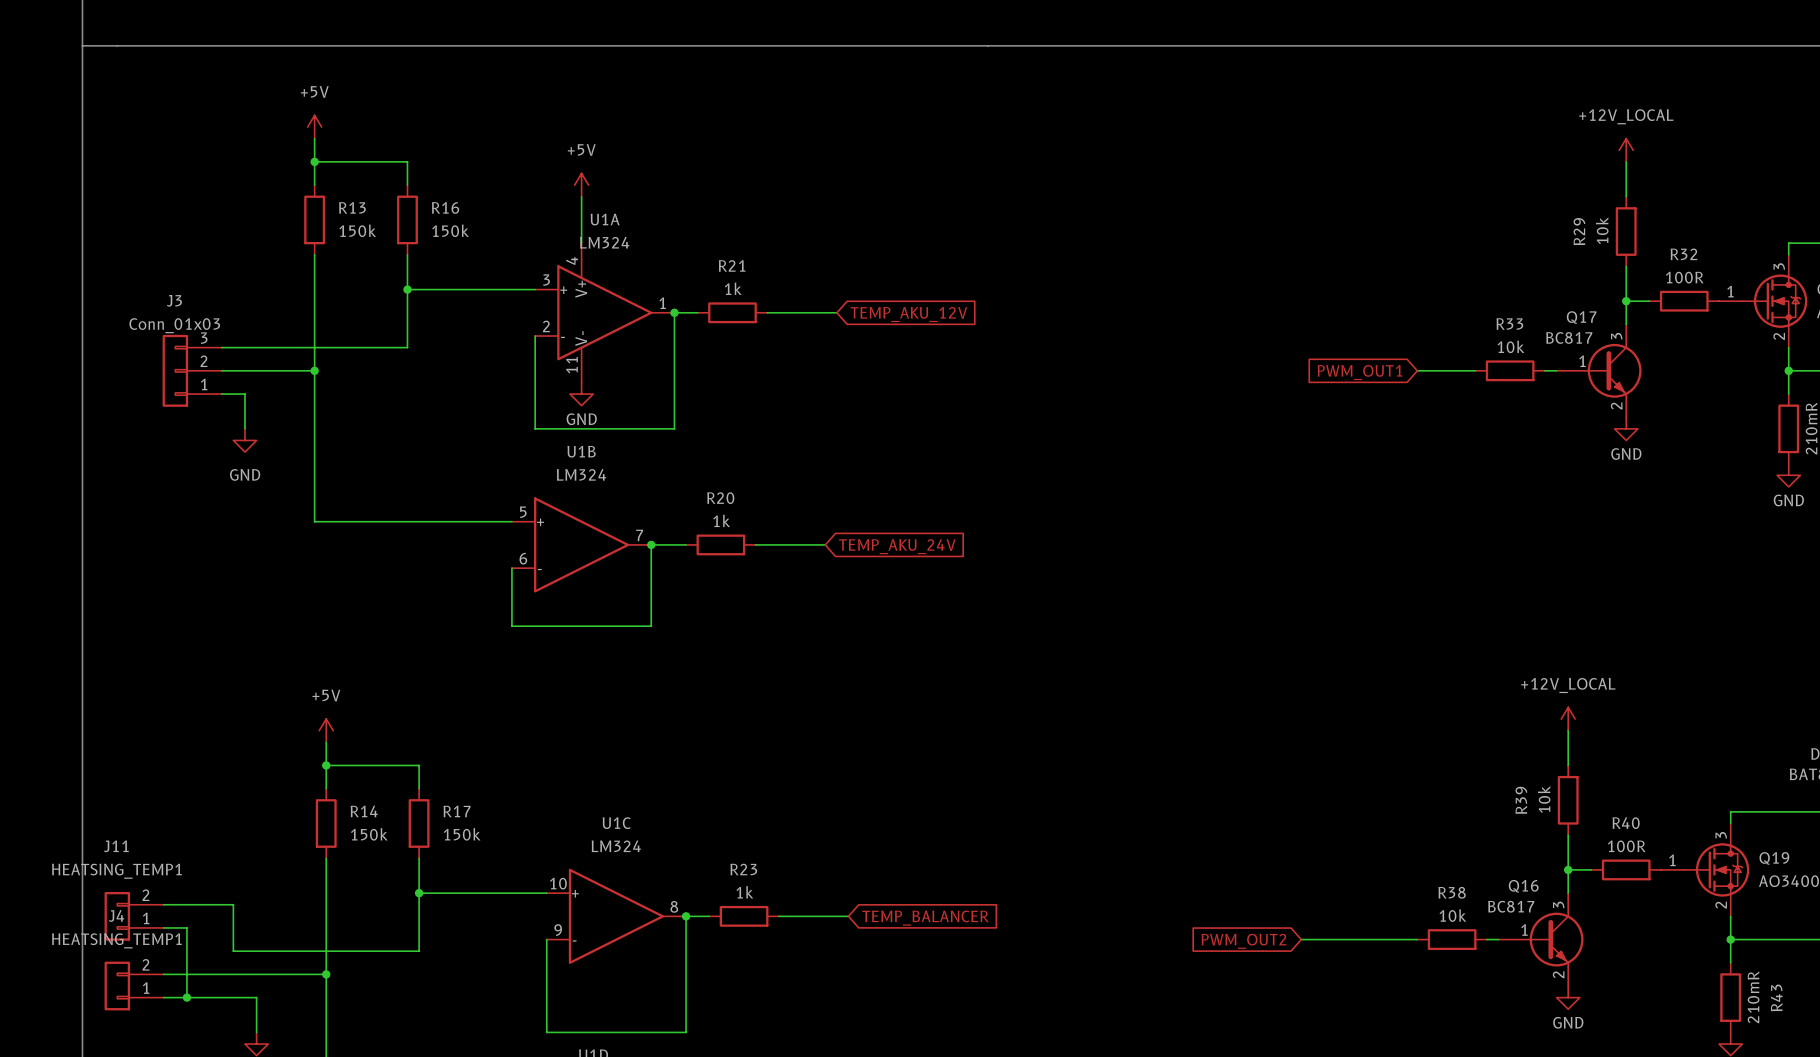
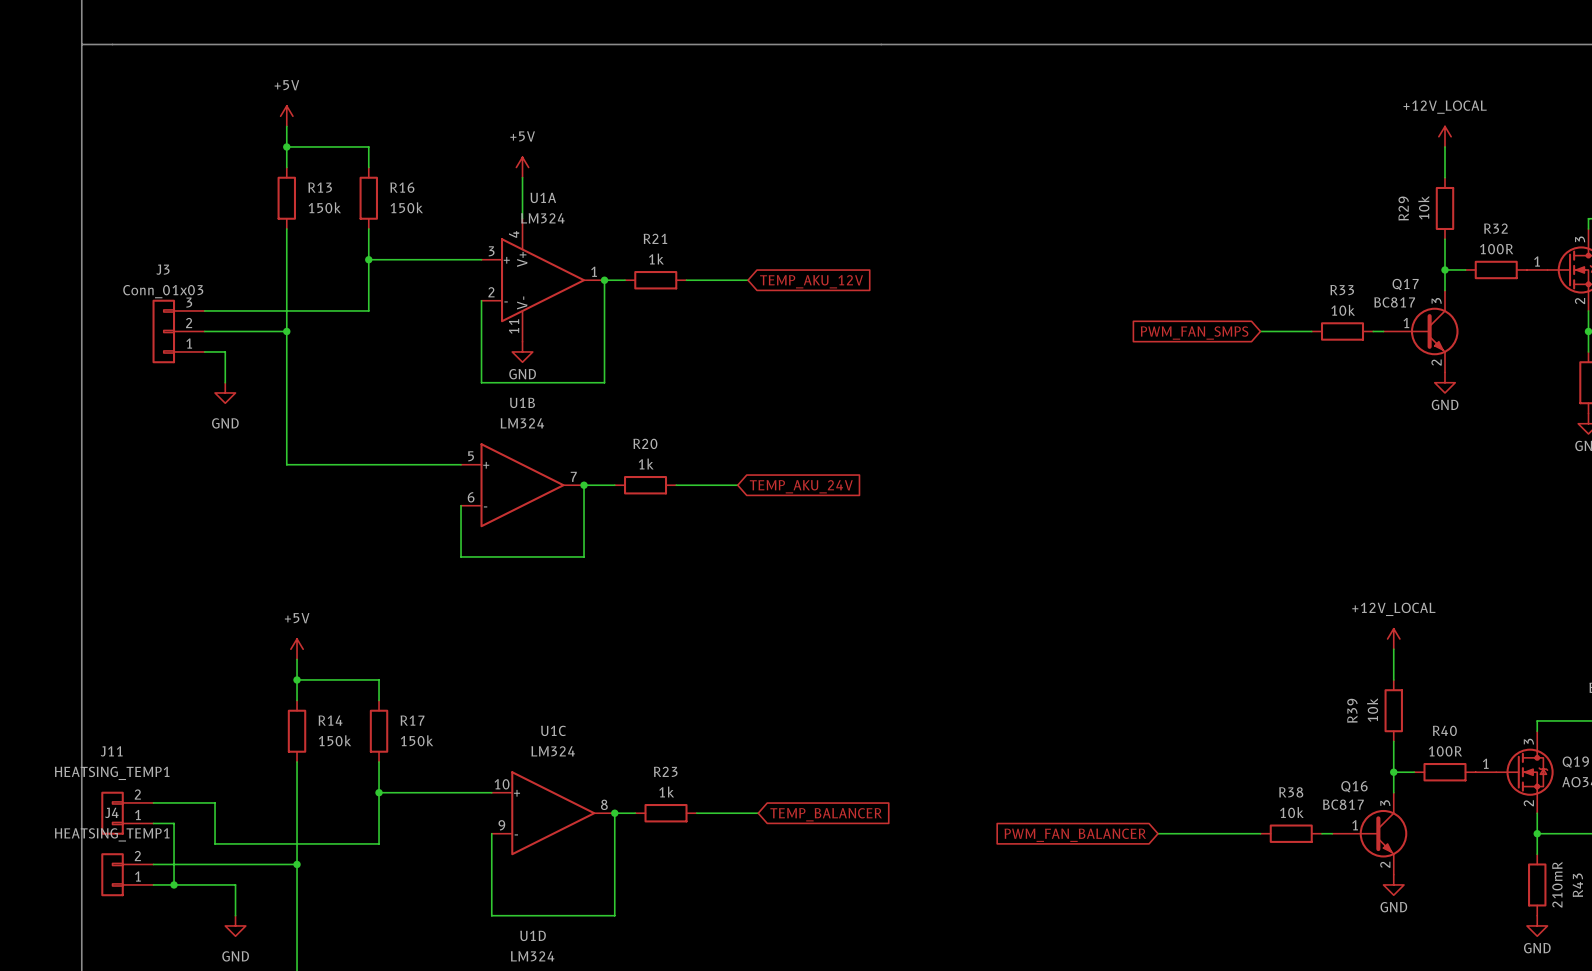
global label: PWM_OUT1 (1359, 372) -> PWM_FAN_SMPS (1194, 333)
global label: PWM_OUT2 (1243, 941) -> PWM_FAN_BALANCER (1075, 835)

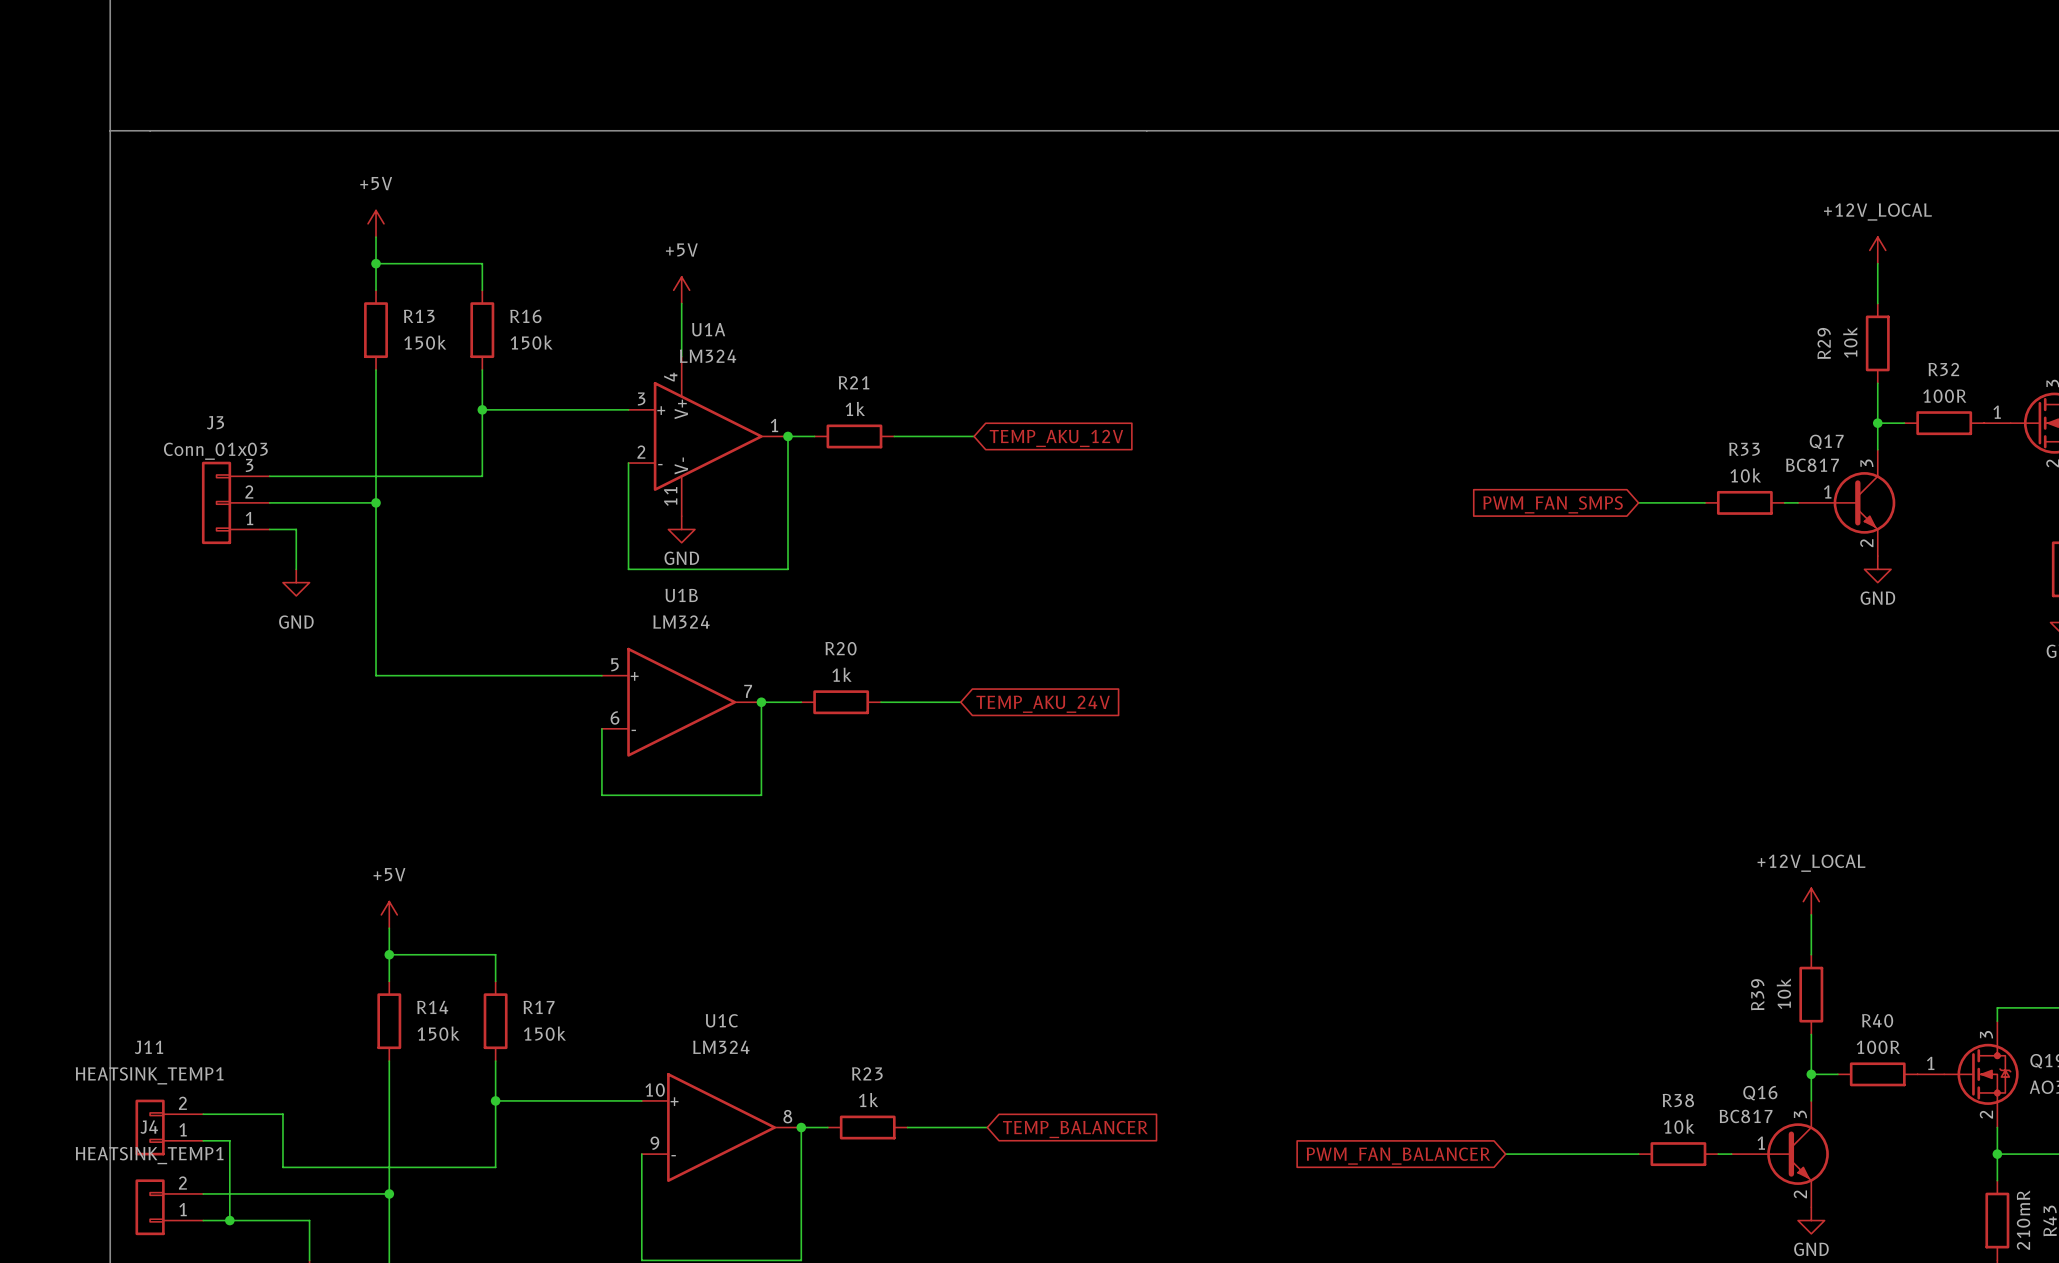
J11 value: HEATSING_TEMP1 (112, 773) -> HEATSINK_TEMP1 (149, 1075)
J4 value: HEATSING_TEMP1 (112, 834) -> HEATSINK_TEMP1 (149, 1155)

